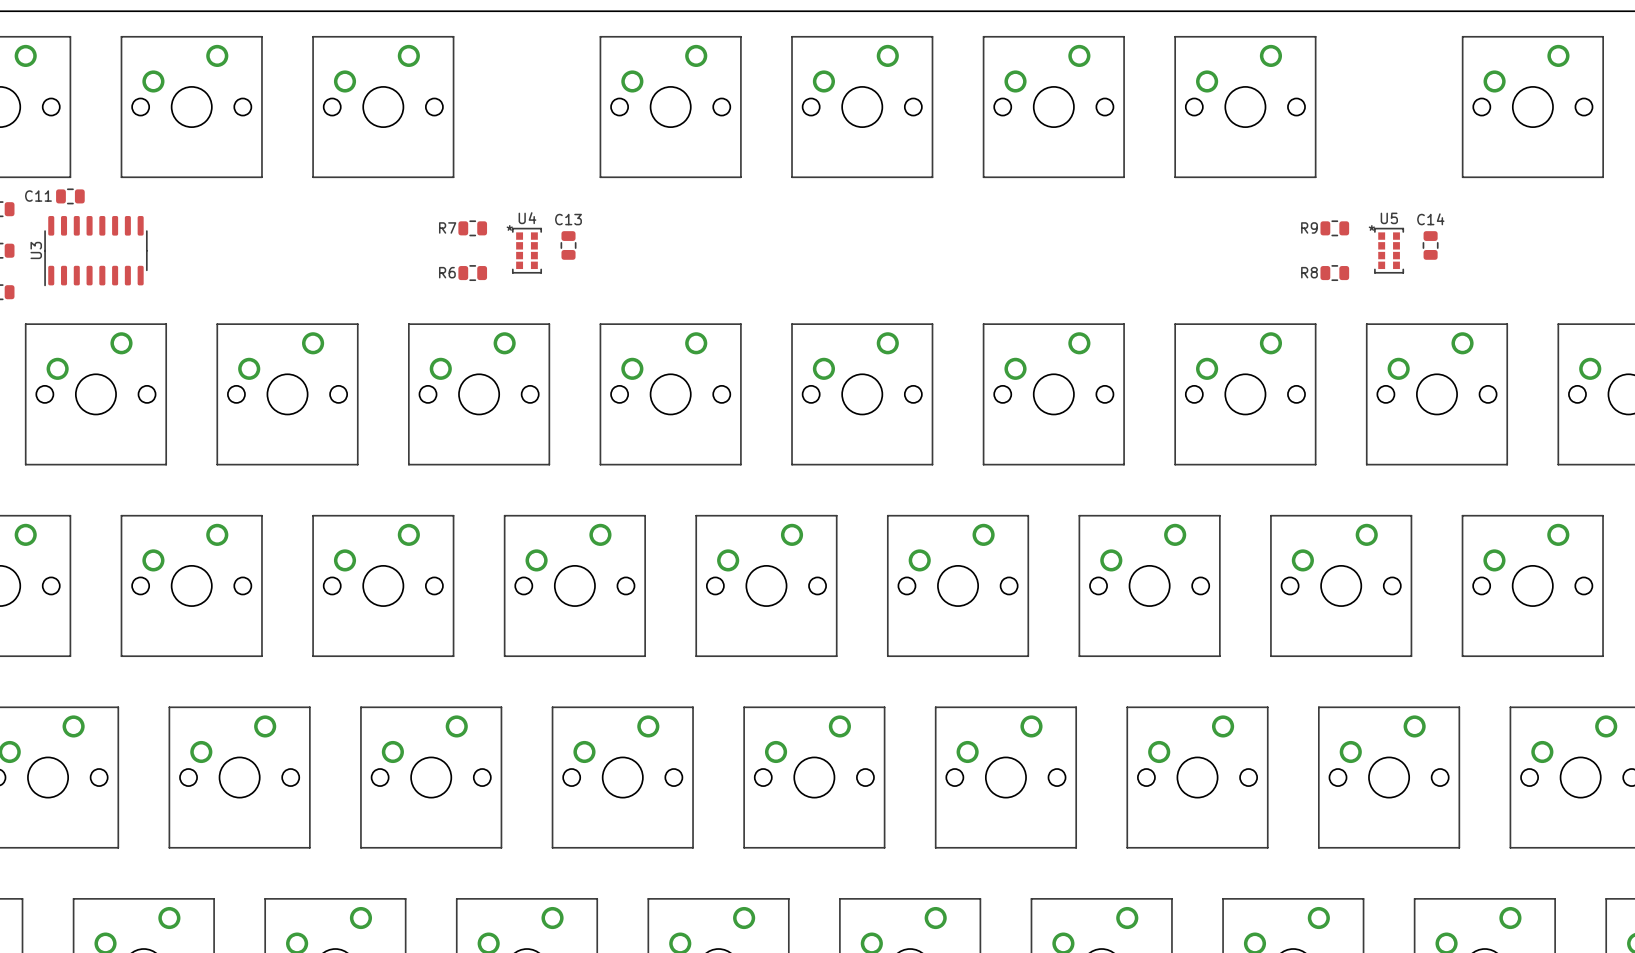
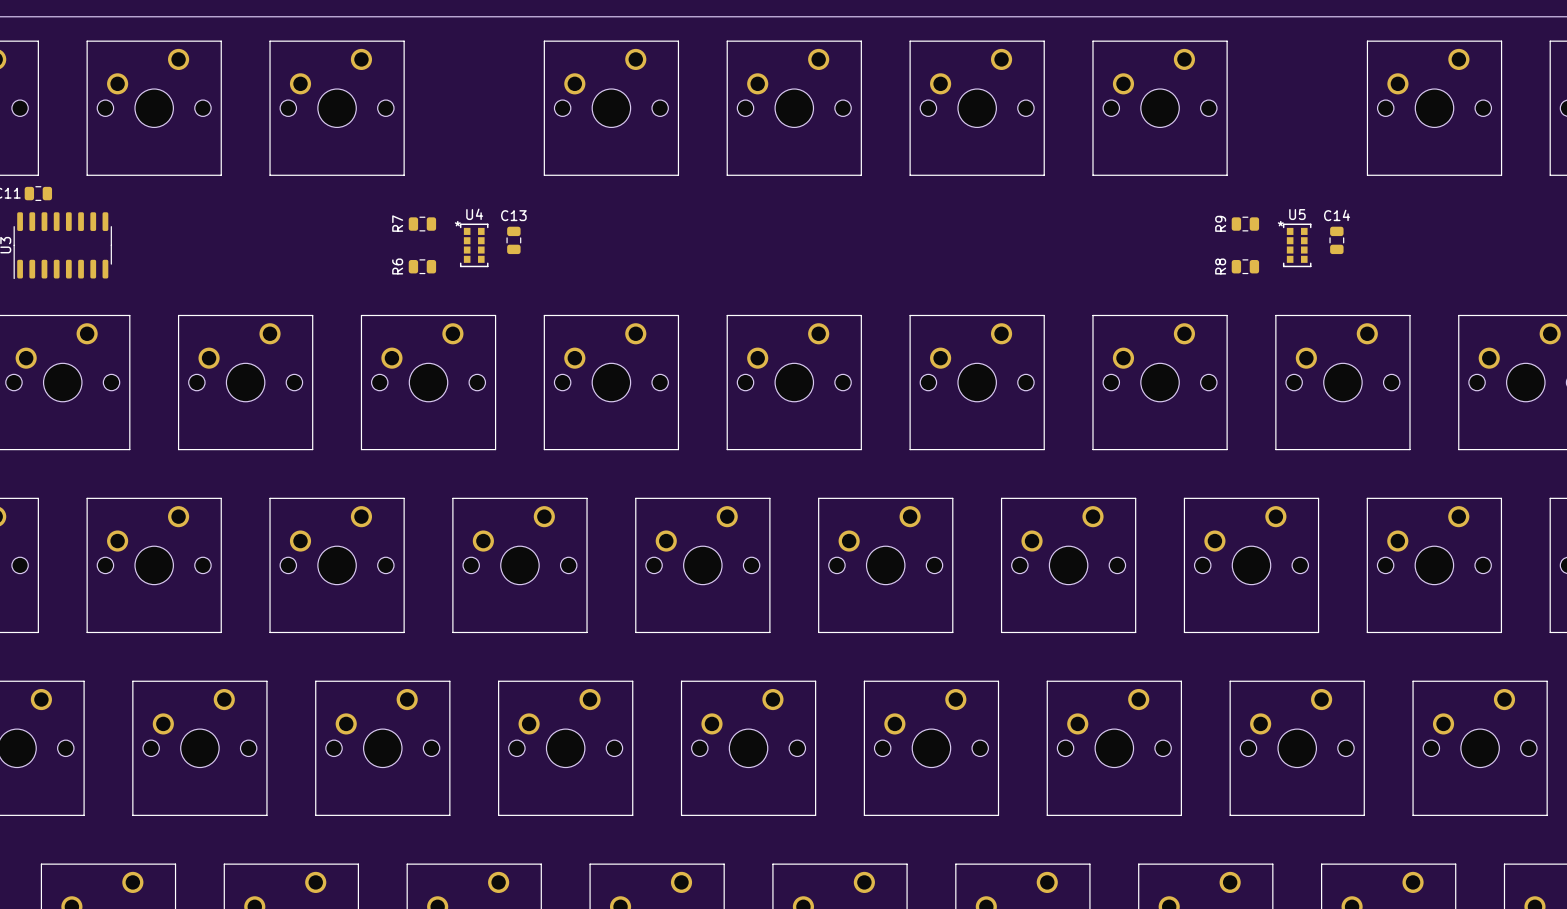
R7 name rotation: 0° (447, 227) -> 90° counterclockwise (397, 223)
R9 name rotation: 0° (1309, 227) -> 90° counterclockwise (1220, 223)
R6 name rotation: 0° (447, 272) -> 90° counterclockwise (397, 266)
R8 name rotation: 0° (1309, 272) -> 90° counterclockwise (1220, 266)

